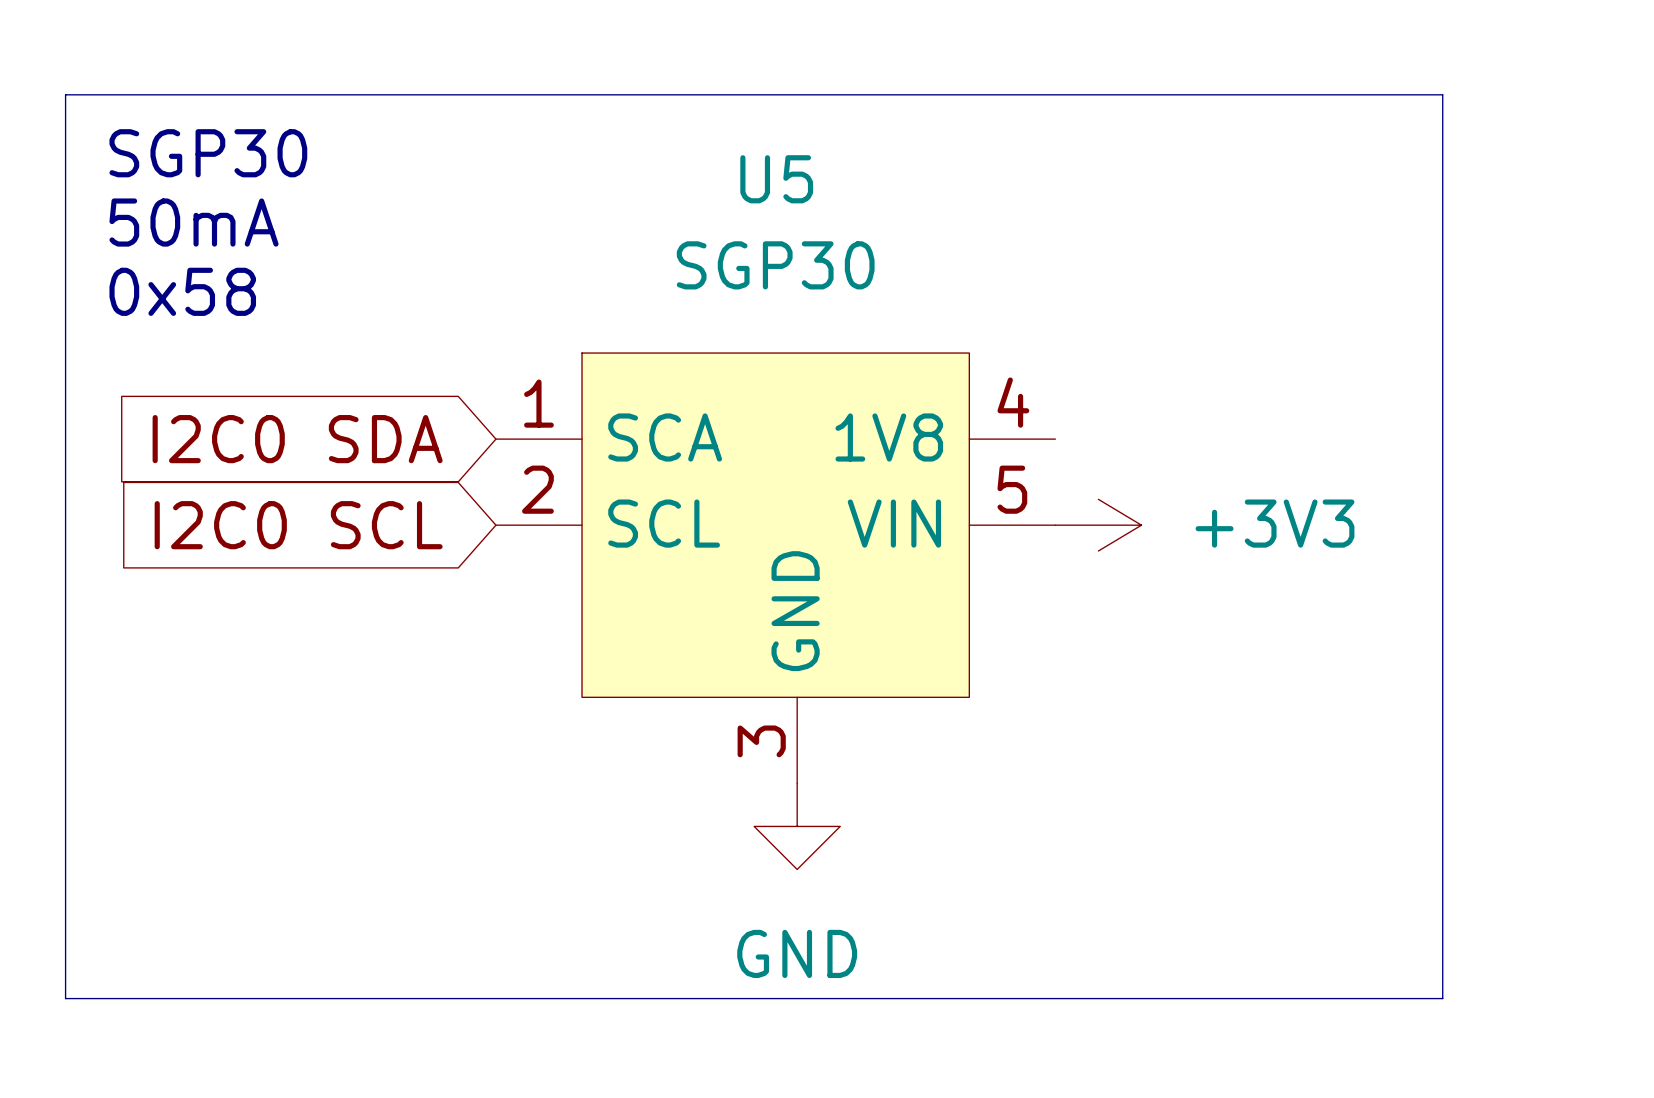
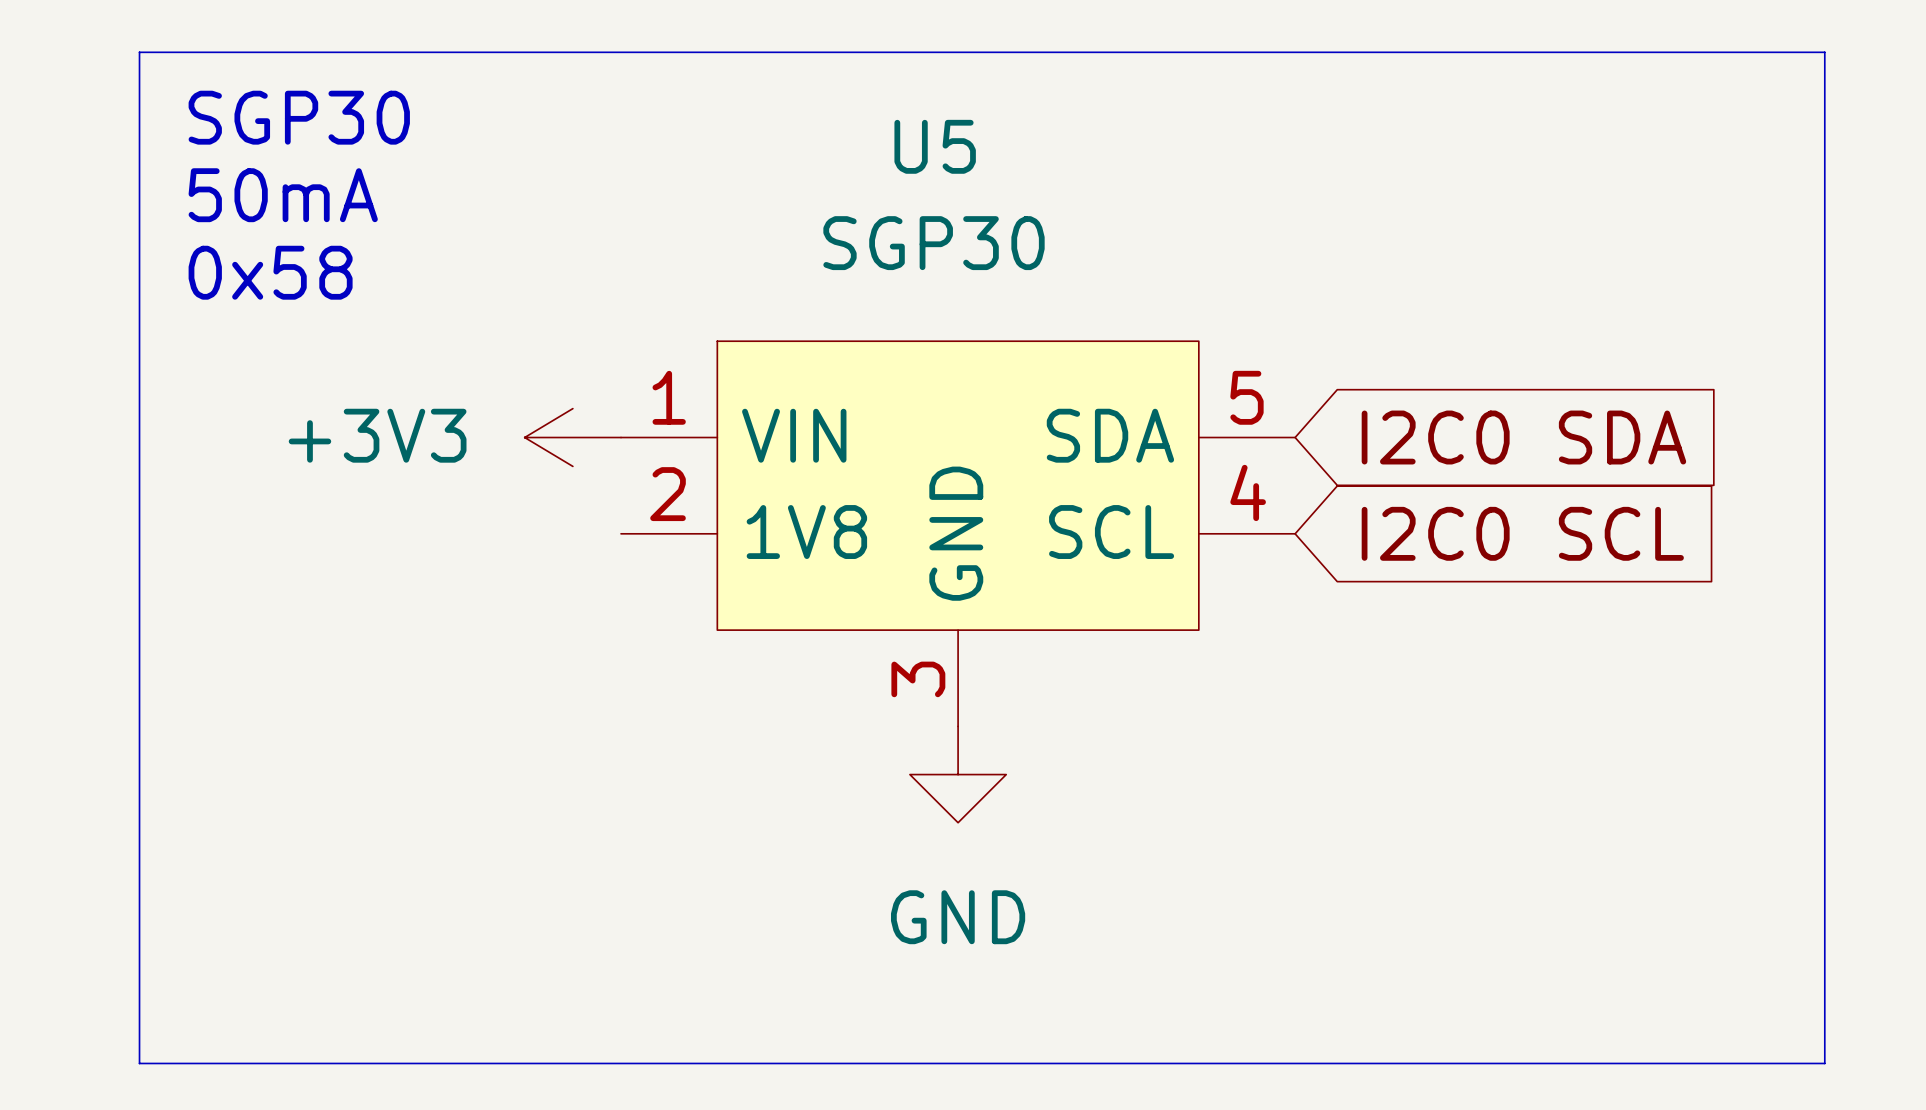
line: (1442, 94) (1442, 998) -> (1680, 52) (1824, 52) (1824, 1063) (1680, 1063)
U5 symbol: [495, 353, 1056, 784] -> [621, 341, 1296, 727]
global label rotation: 0° (297, 439) -> 180° (1523, 437)
global label position: I2C0 SDA (297, 439) -> I2C0 SDA (1523, 437)
global label rotation: 0° (298, 525) -> 180° (1522, 533)
global label position: I2C0 SCL (298, 525) -> I2C0 SCL (1522, 533)
power symbol rotation: 0° (1098, 525) -> 180° (572, 437)
power symbol position: +3V3 (1098, 525) -> +3V3 (572, 437)
power symbol position: GND (797, 826) -> GND (958, 774)

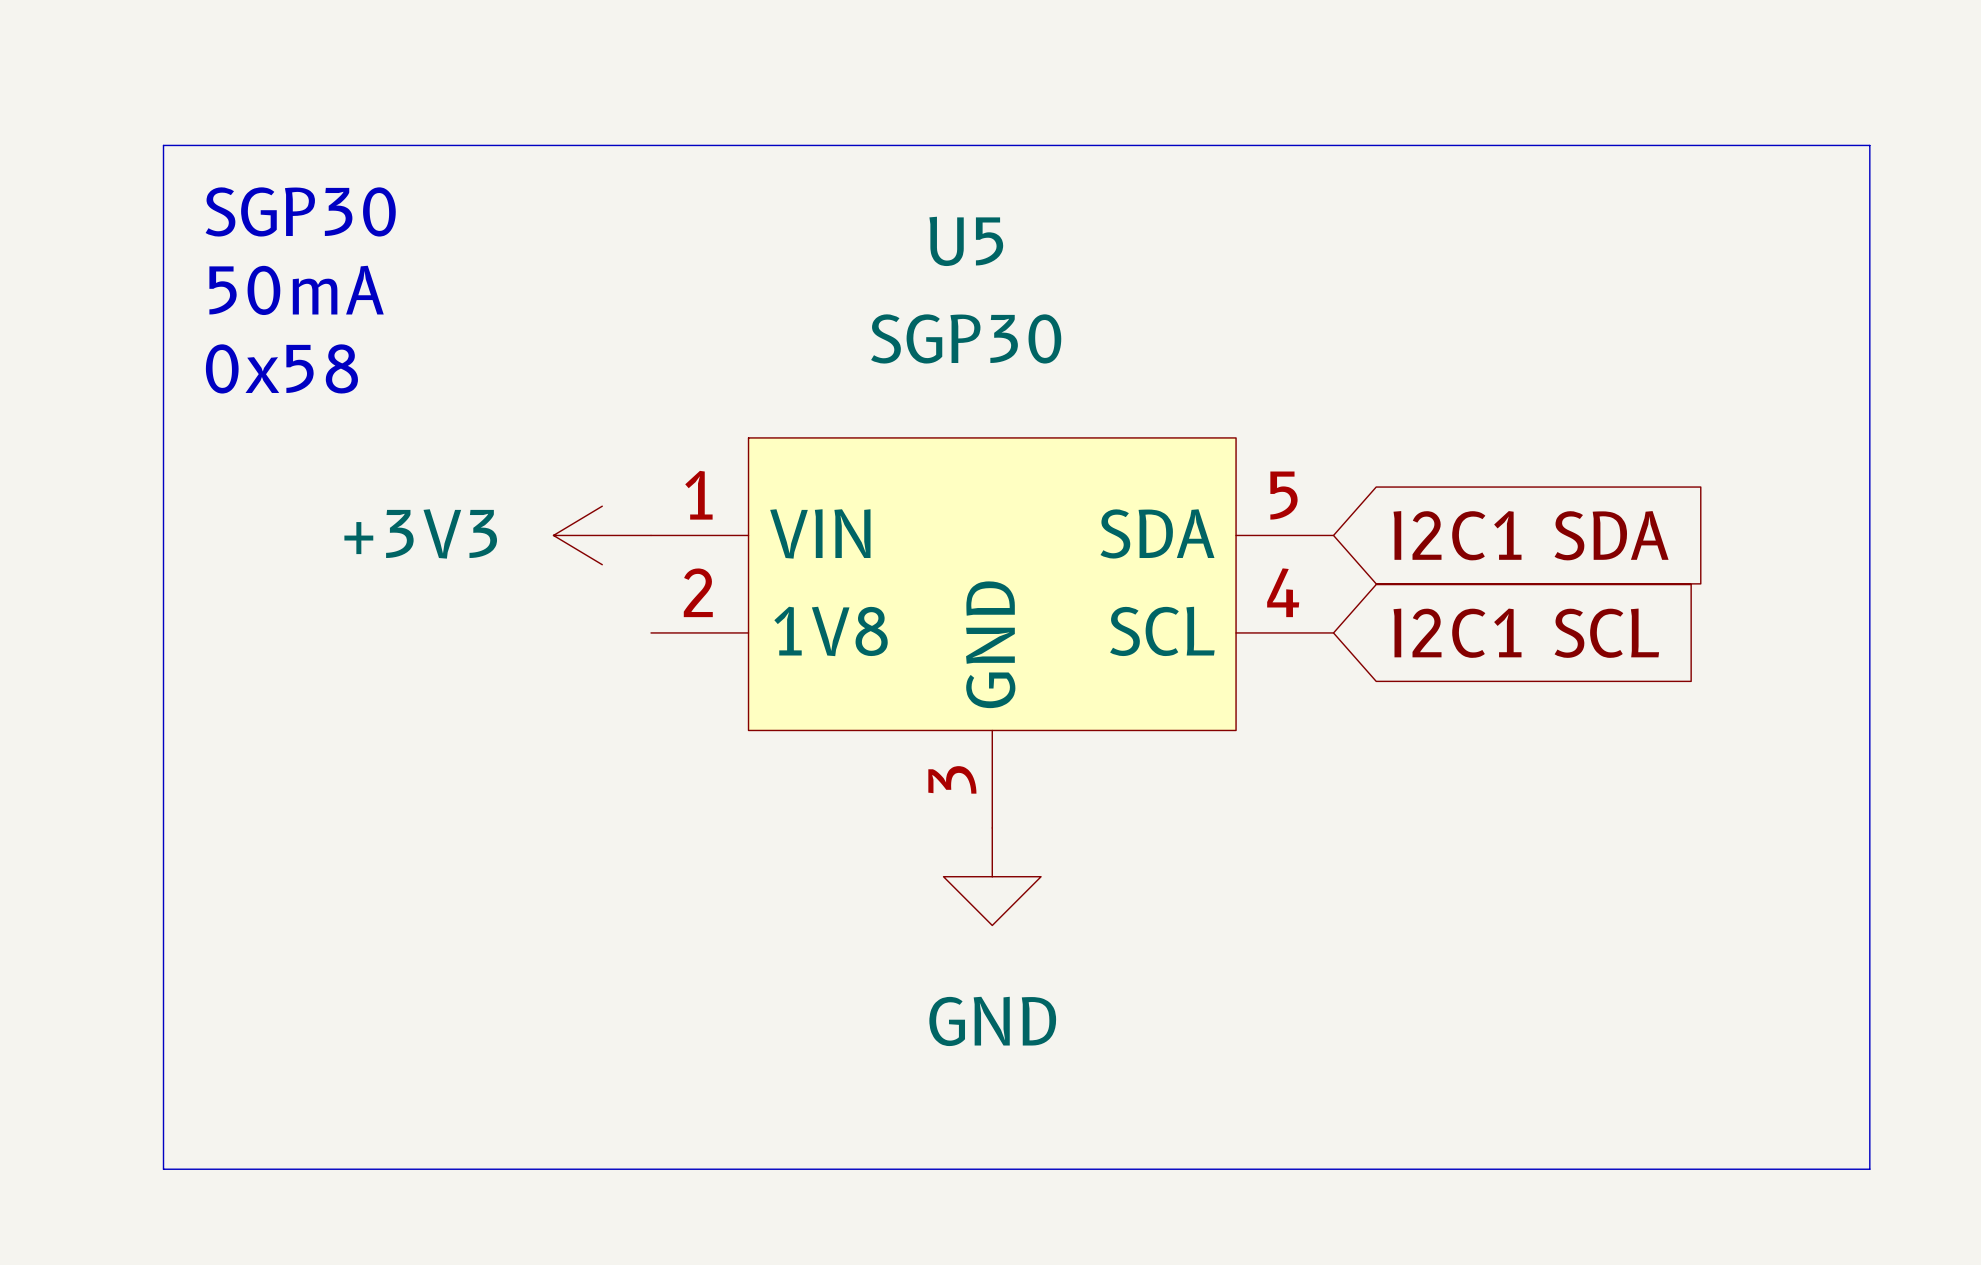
global label: I2C0 SDA (1523, 437) -> I2C1 SDA (1531, 535)
global label: I2C0 SCL (1522, 533) -> I2C1 SCL (1526, 633)

